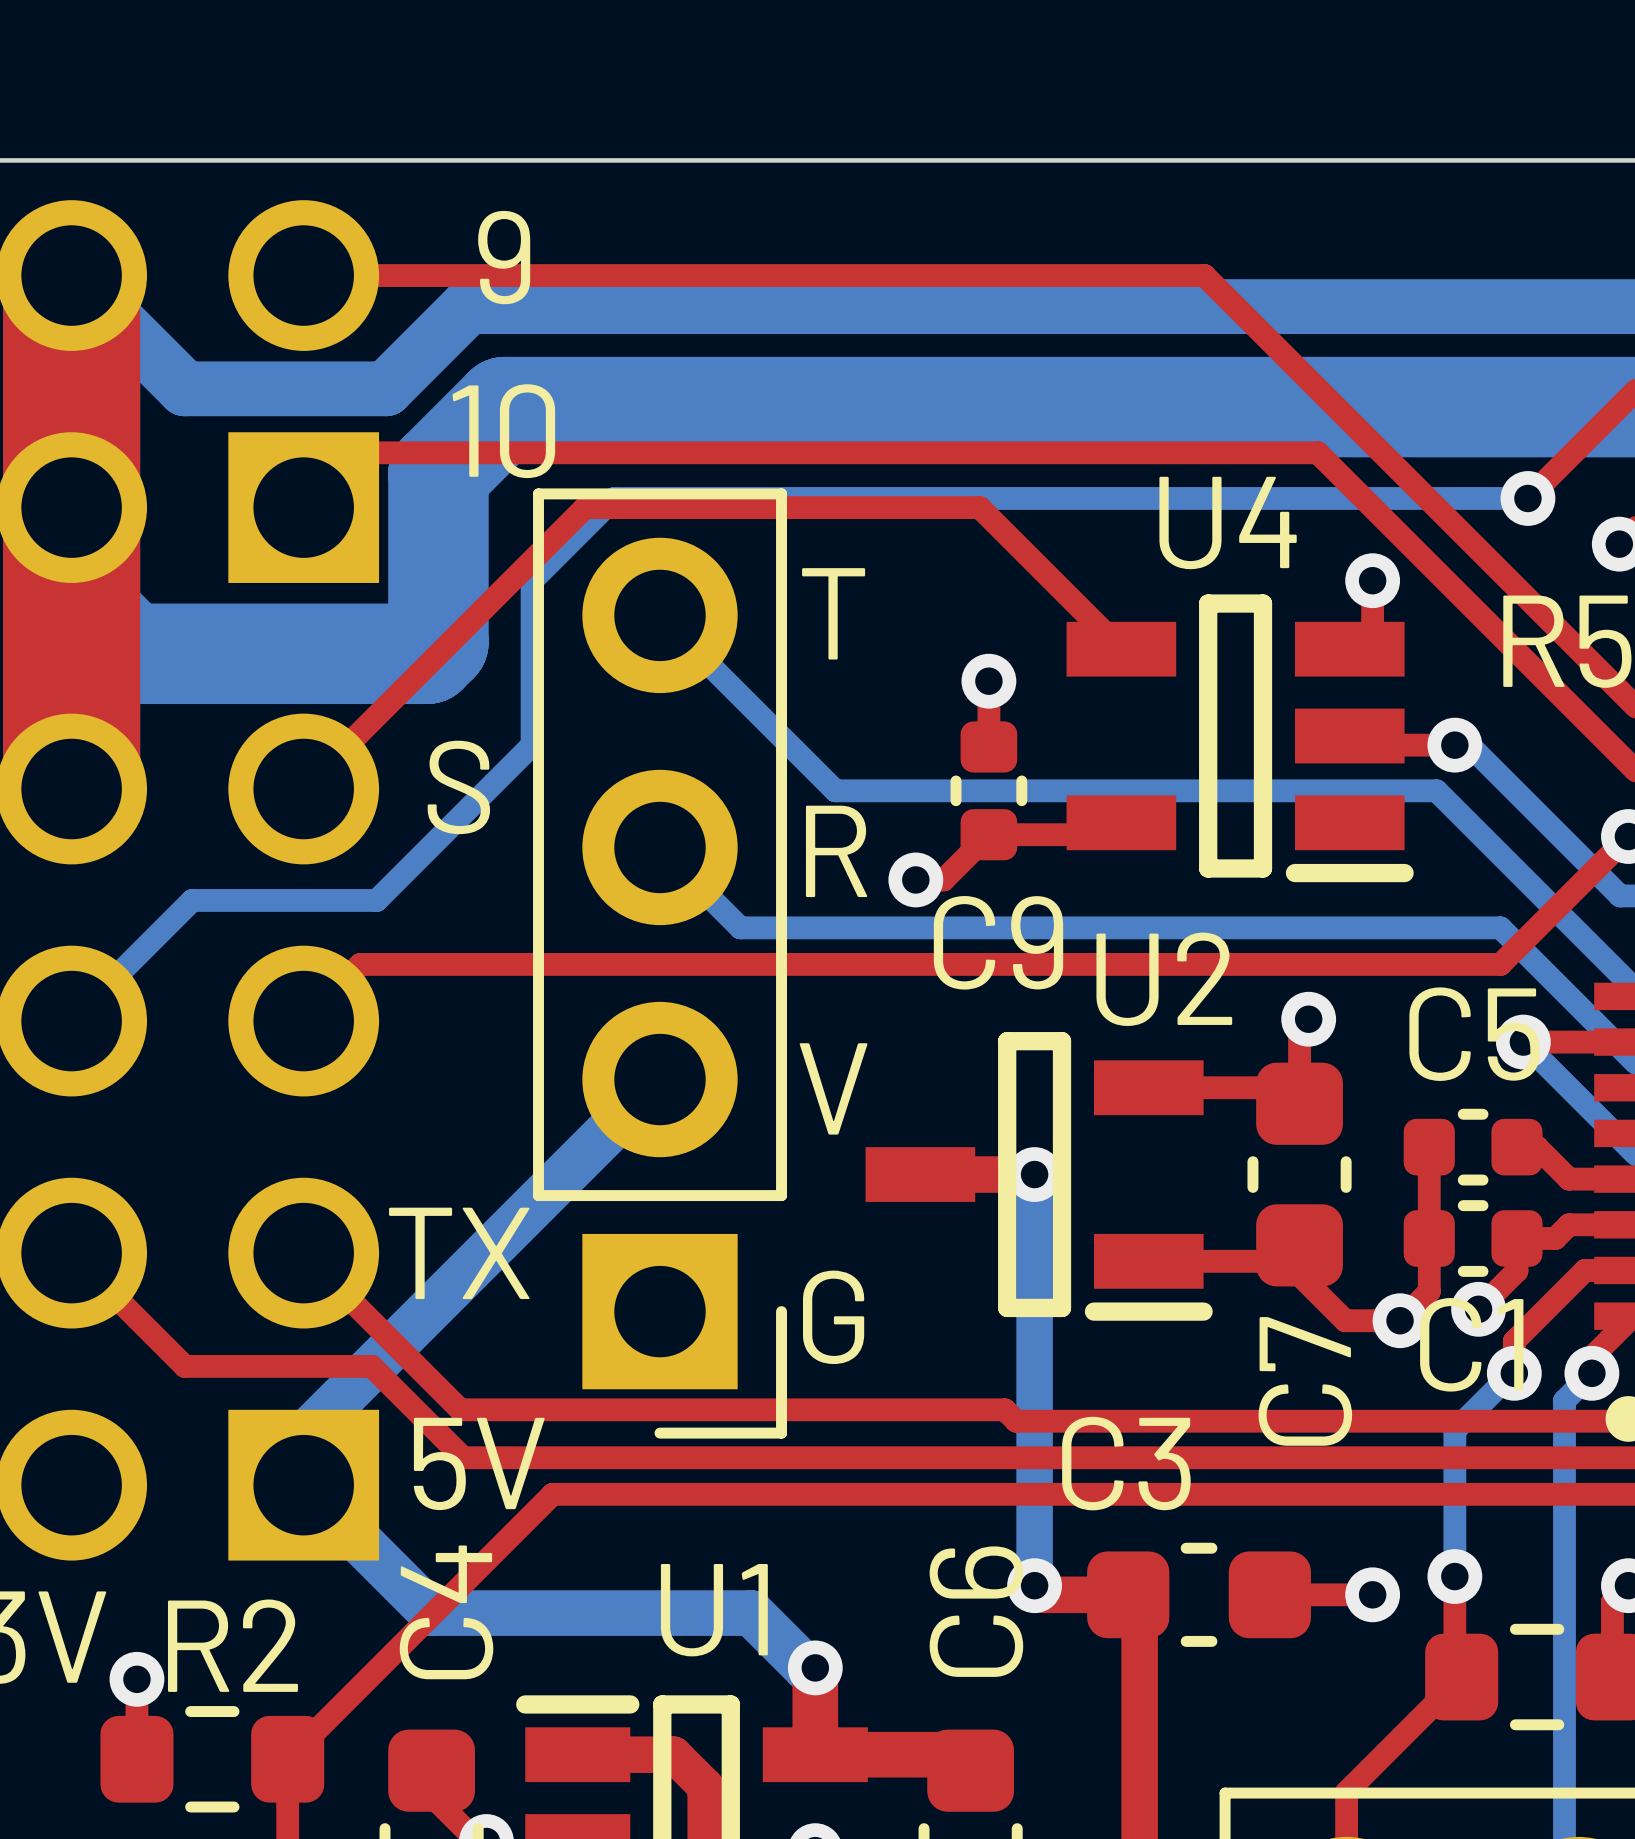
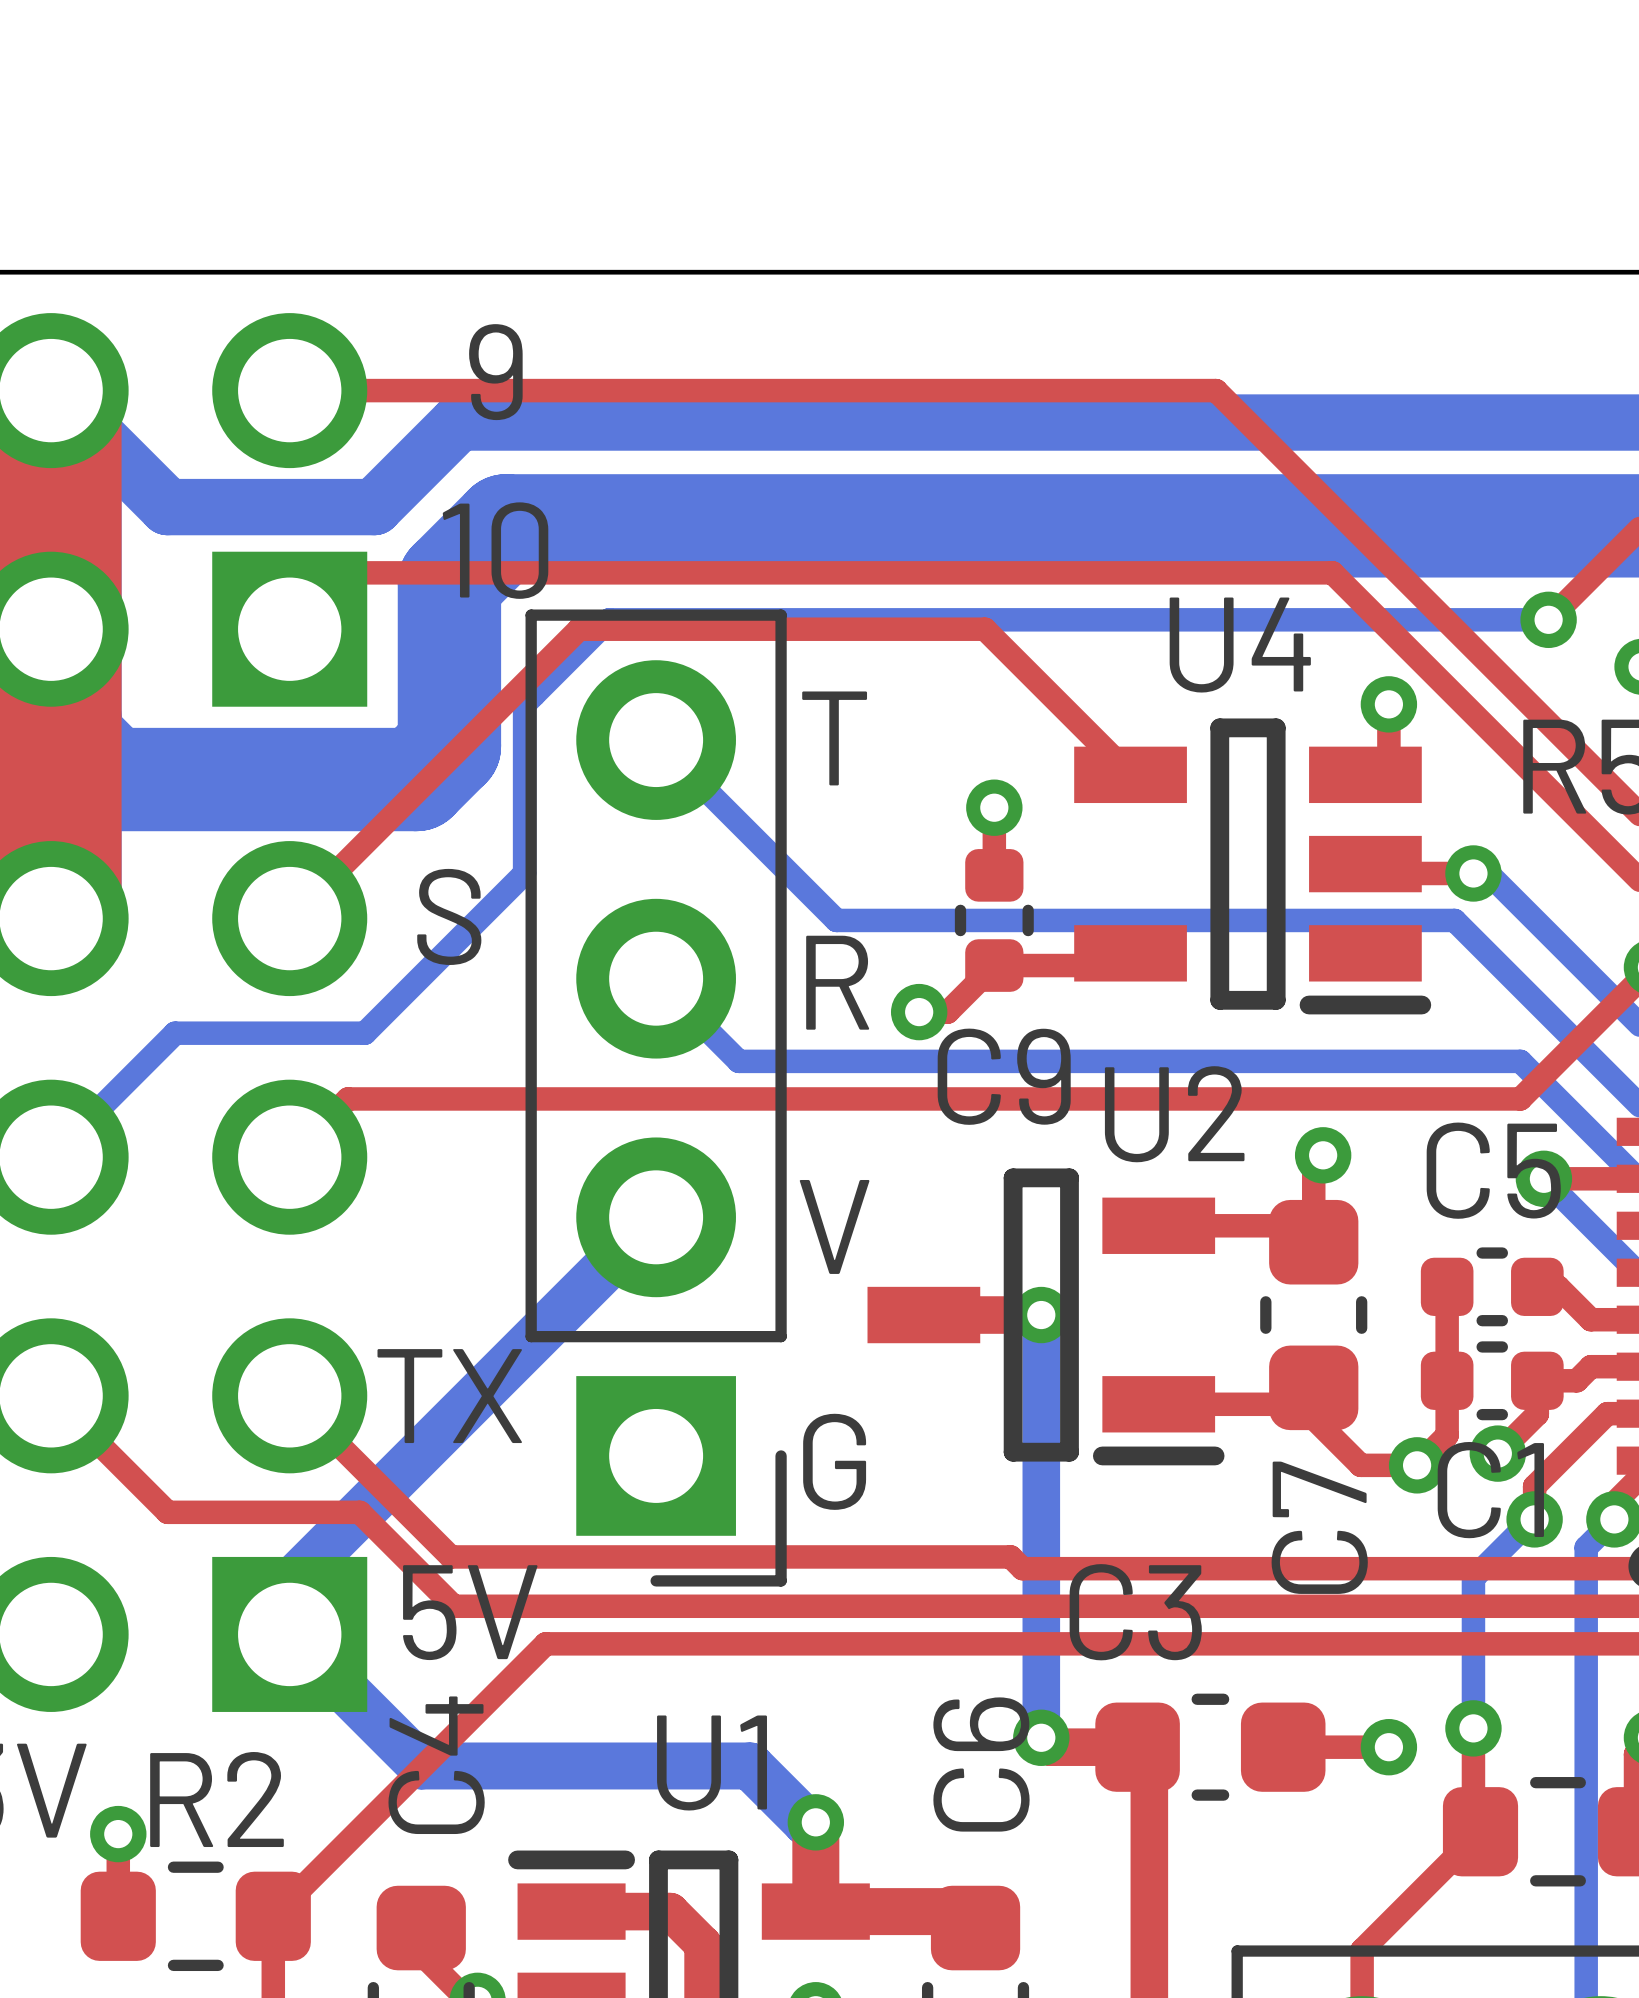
bottom track: (513, 407) (504, 407) (438, 473) (438, 642) -> (505, 525) (449, 582) (449, 746) (428, 767)

